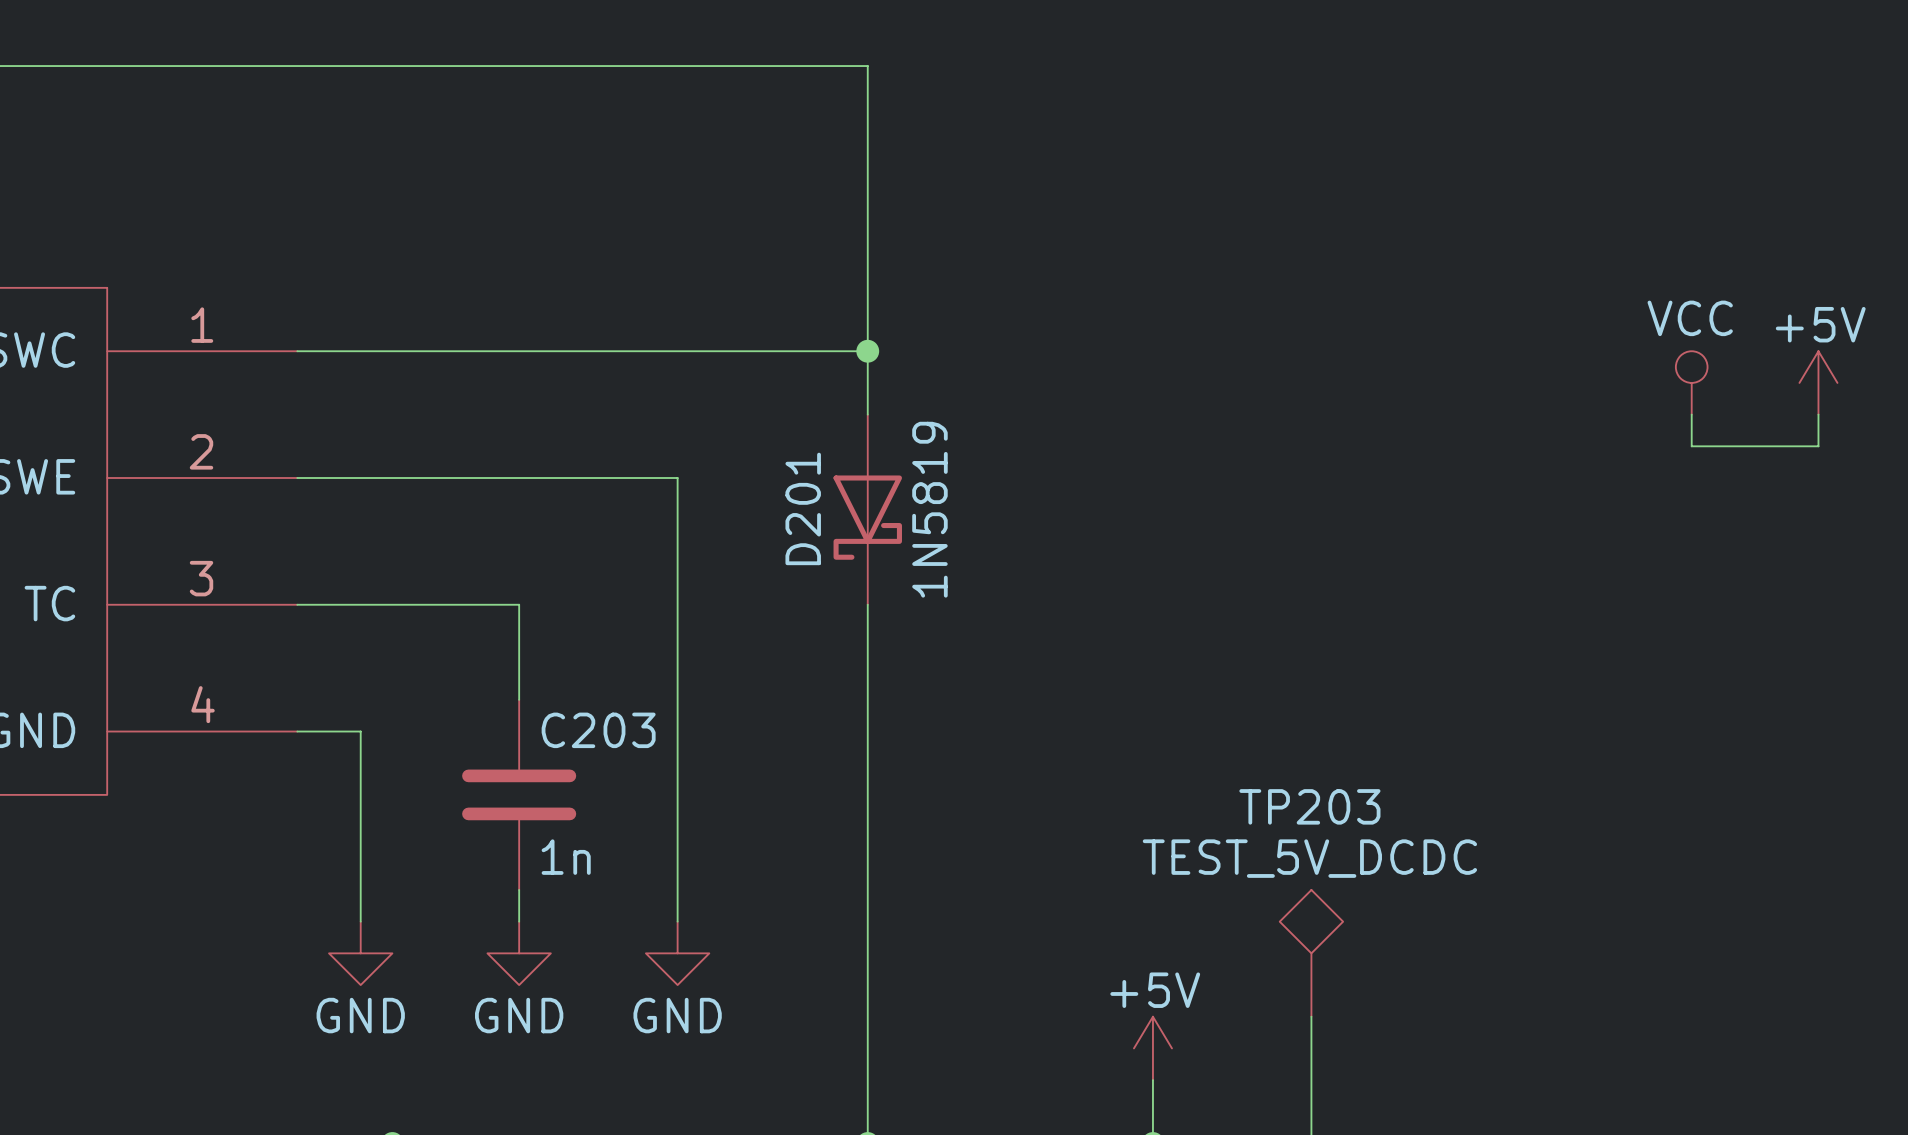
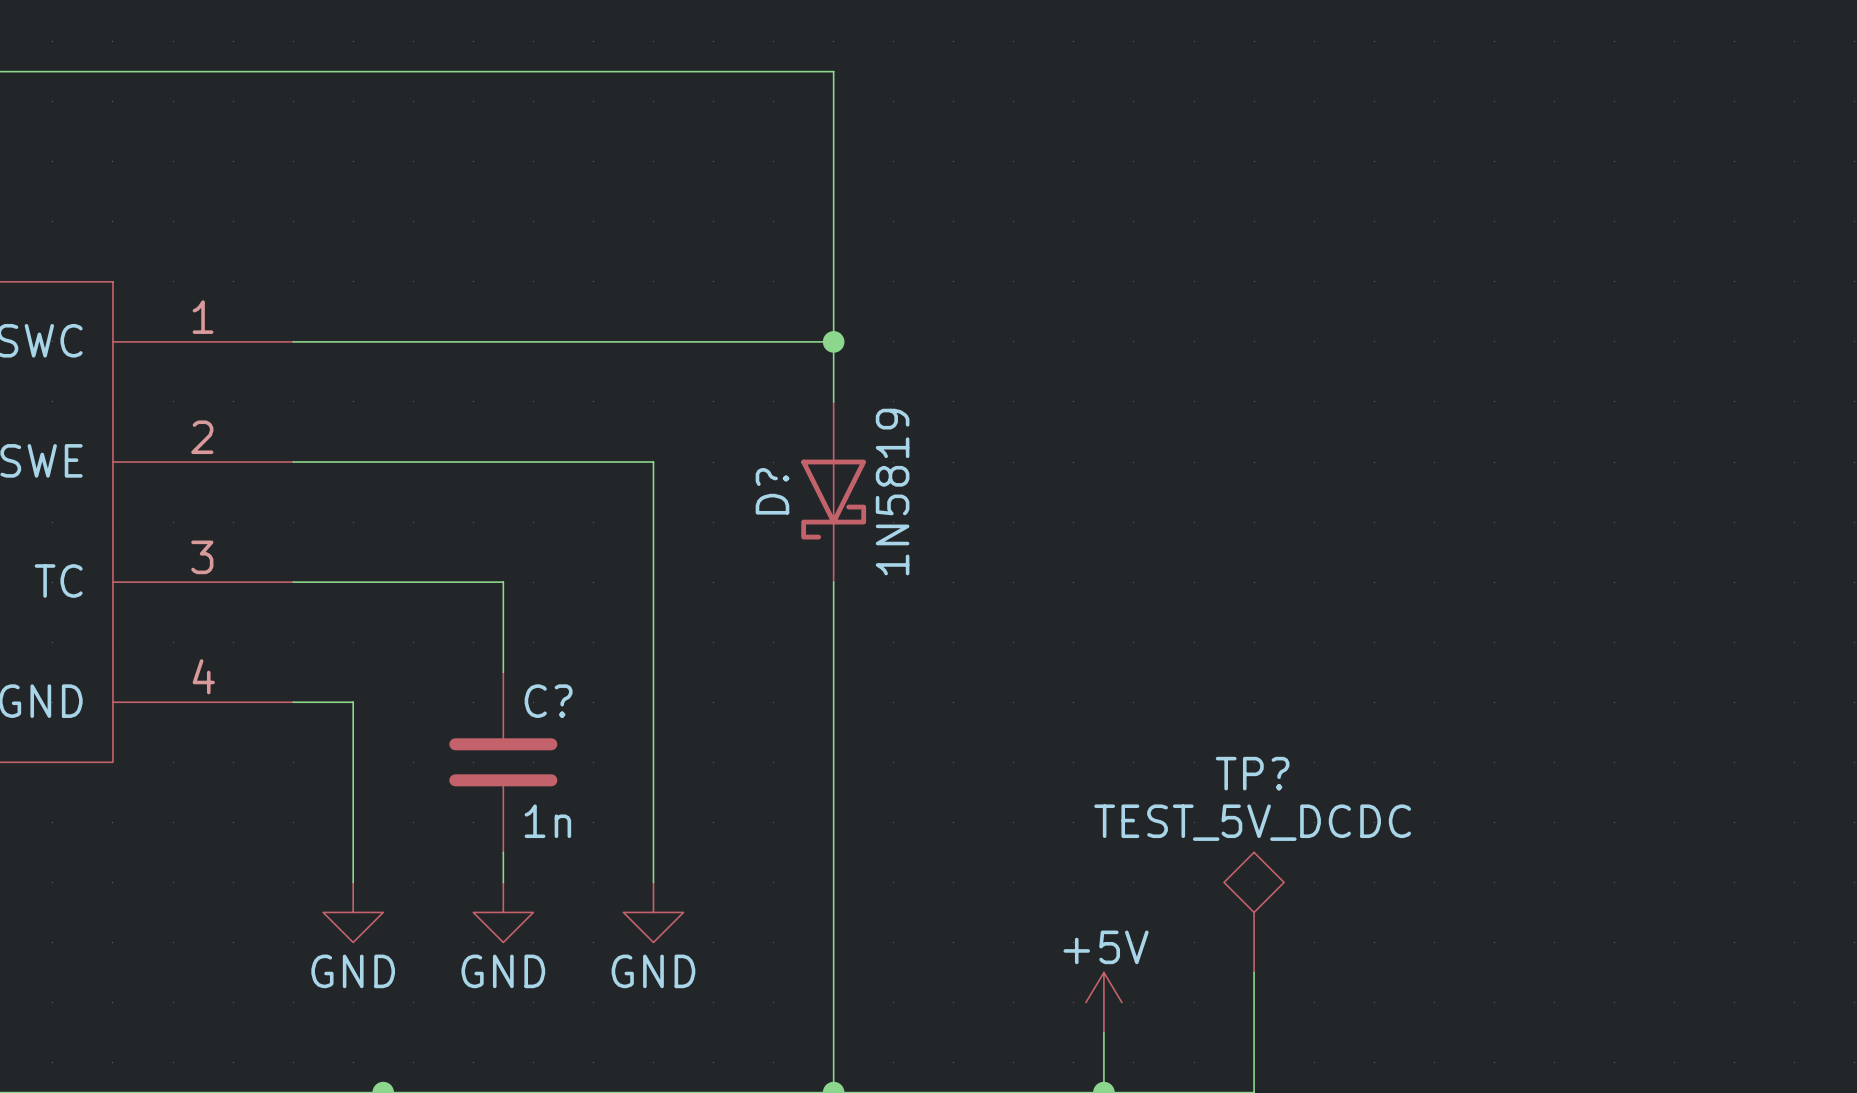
power symbol: VCC (1691, 382) -> none
power symbol: +5V (1818, 382) -> none
wire: (1691, 414) (1691, 446) (1818, 446) (1818, 414) -> none
D201 name: D201 (803, 508) -> D? (772, 491)
C203 name: C203 (598, 730) -> C? (548, 701)
TP203 name: TP203 (1309, 806) -> TP? (1252, 773)

